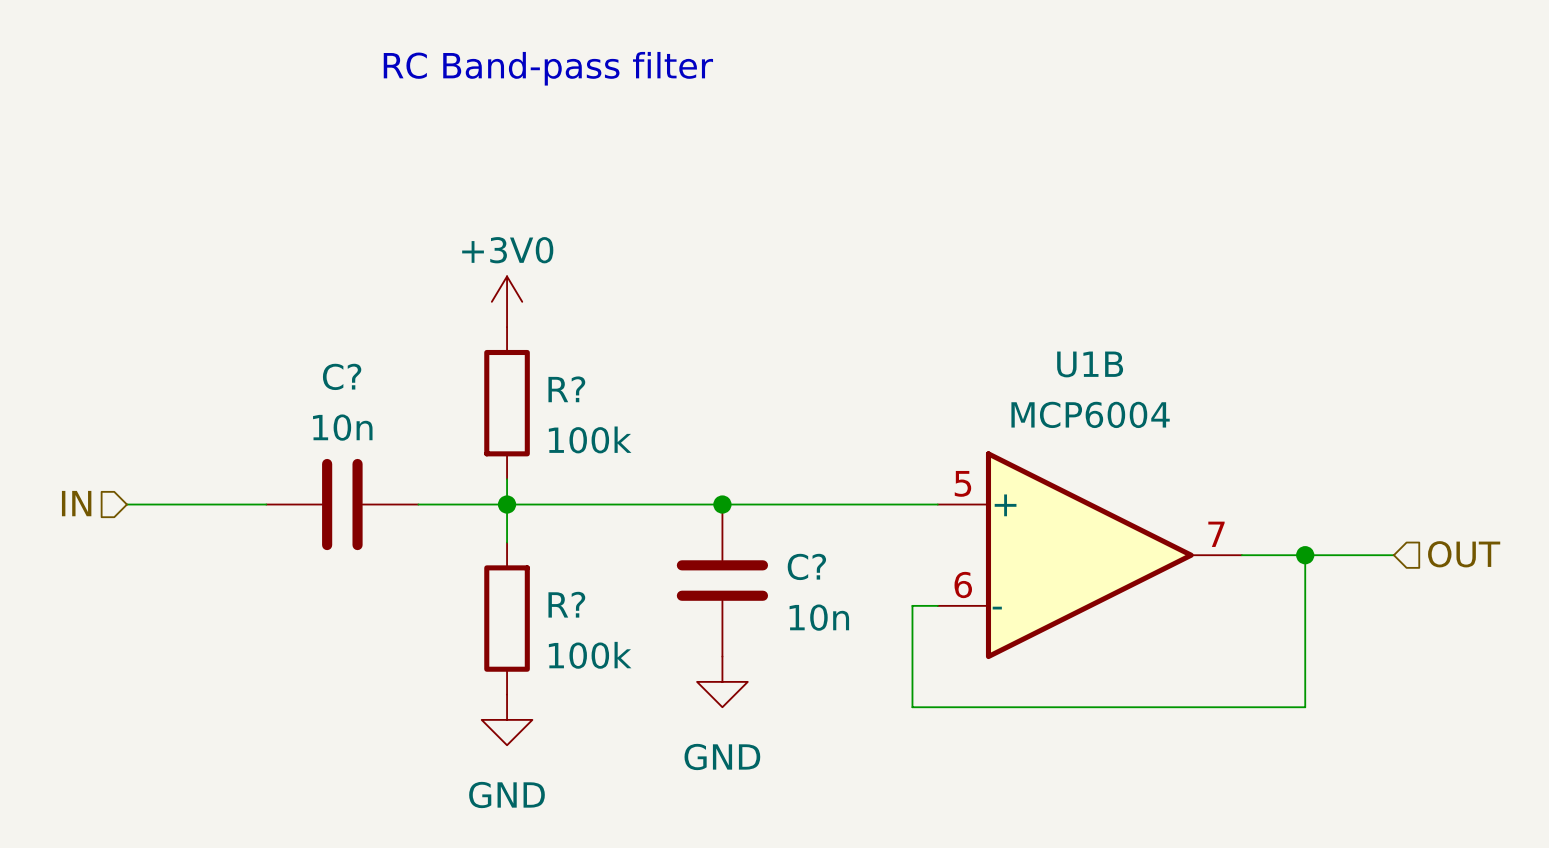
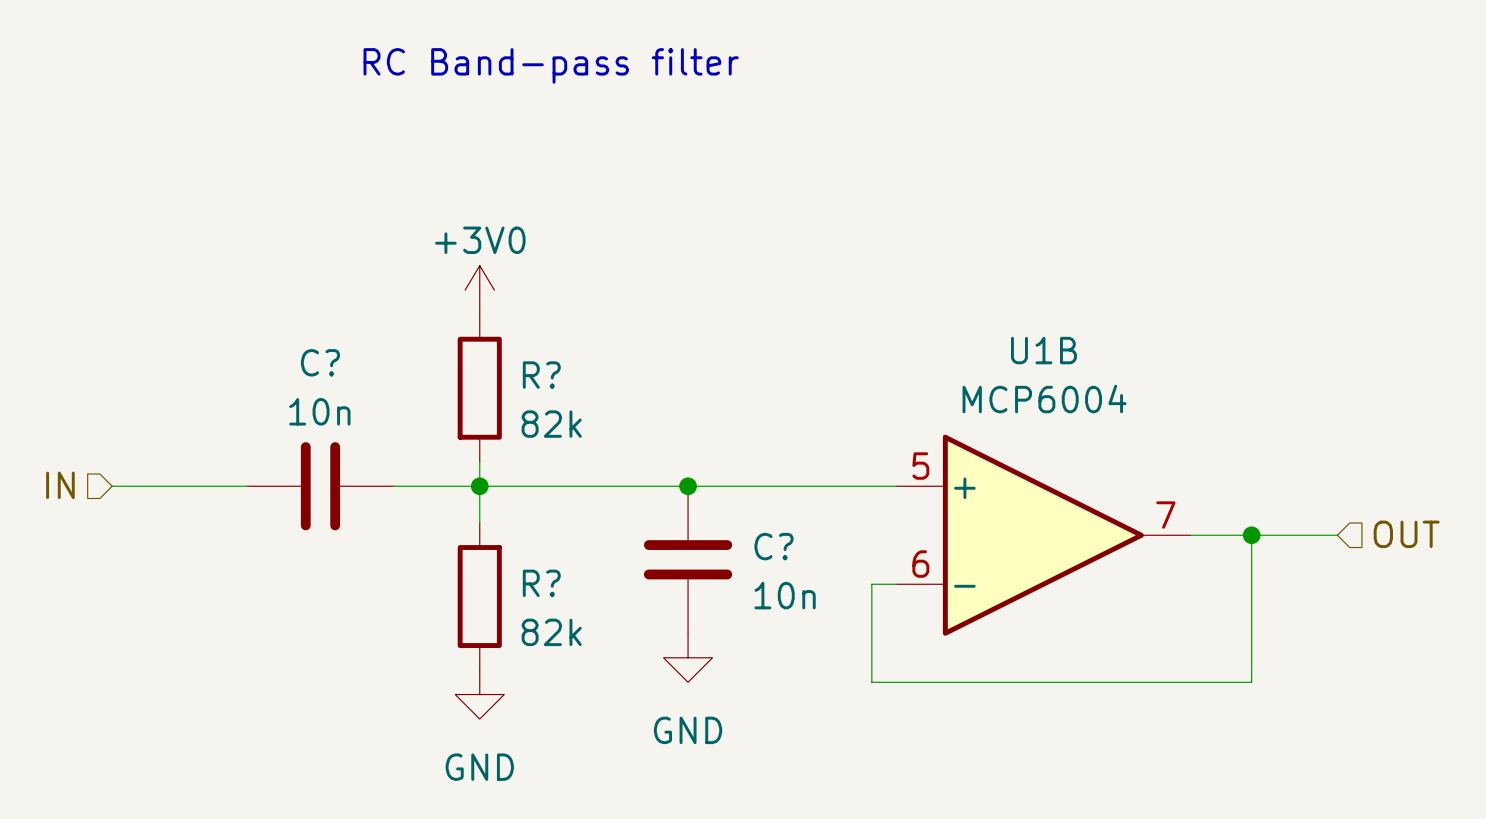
R? value: 100k (590, 439) -> 82k (551, 424)
R? value: 100k (590, 655) -> 82k (551, 632)

